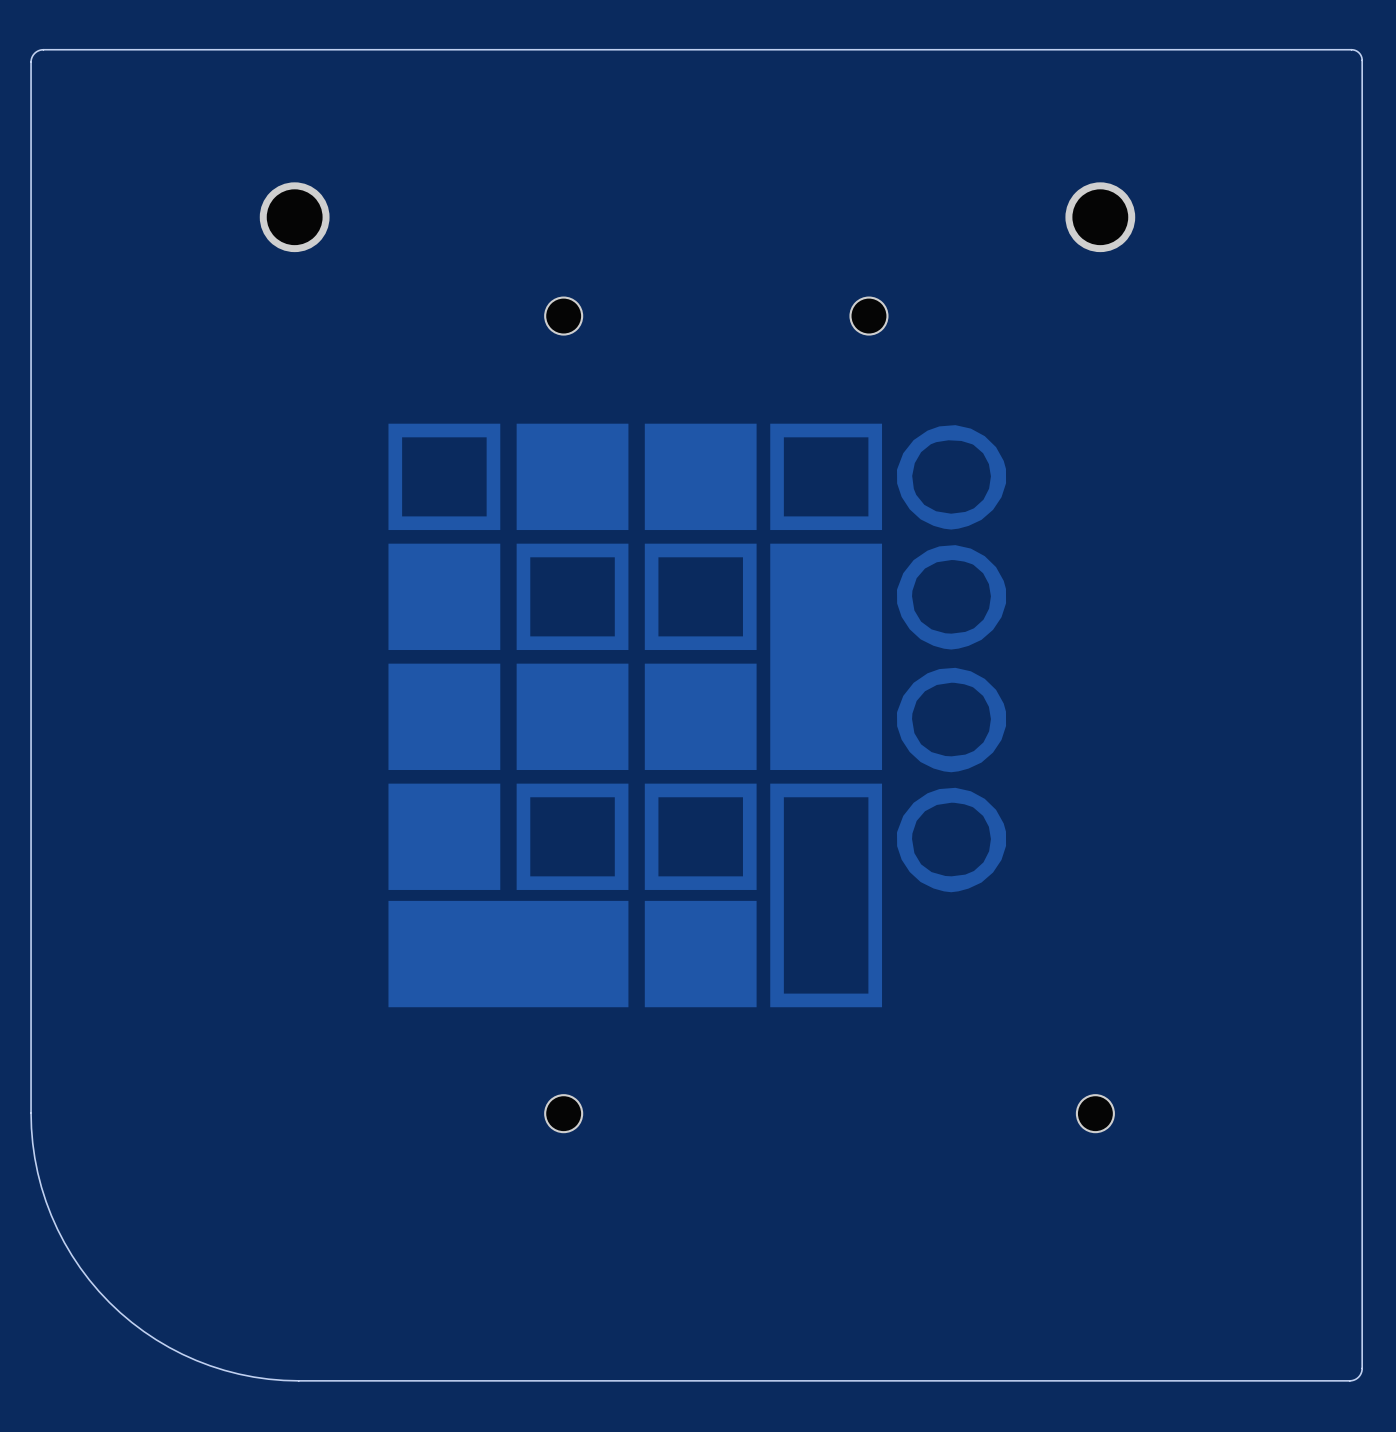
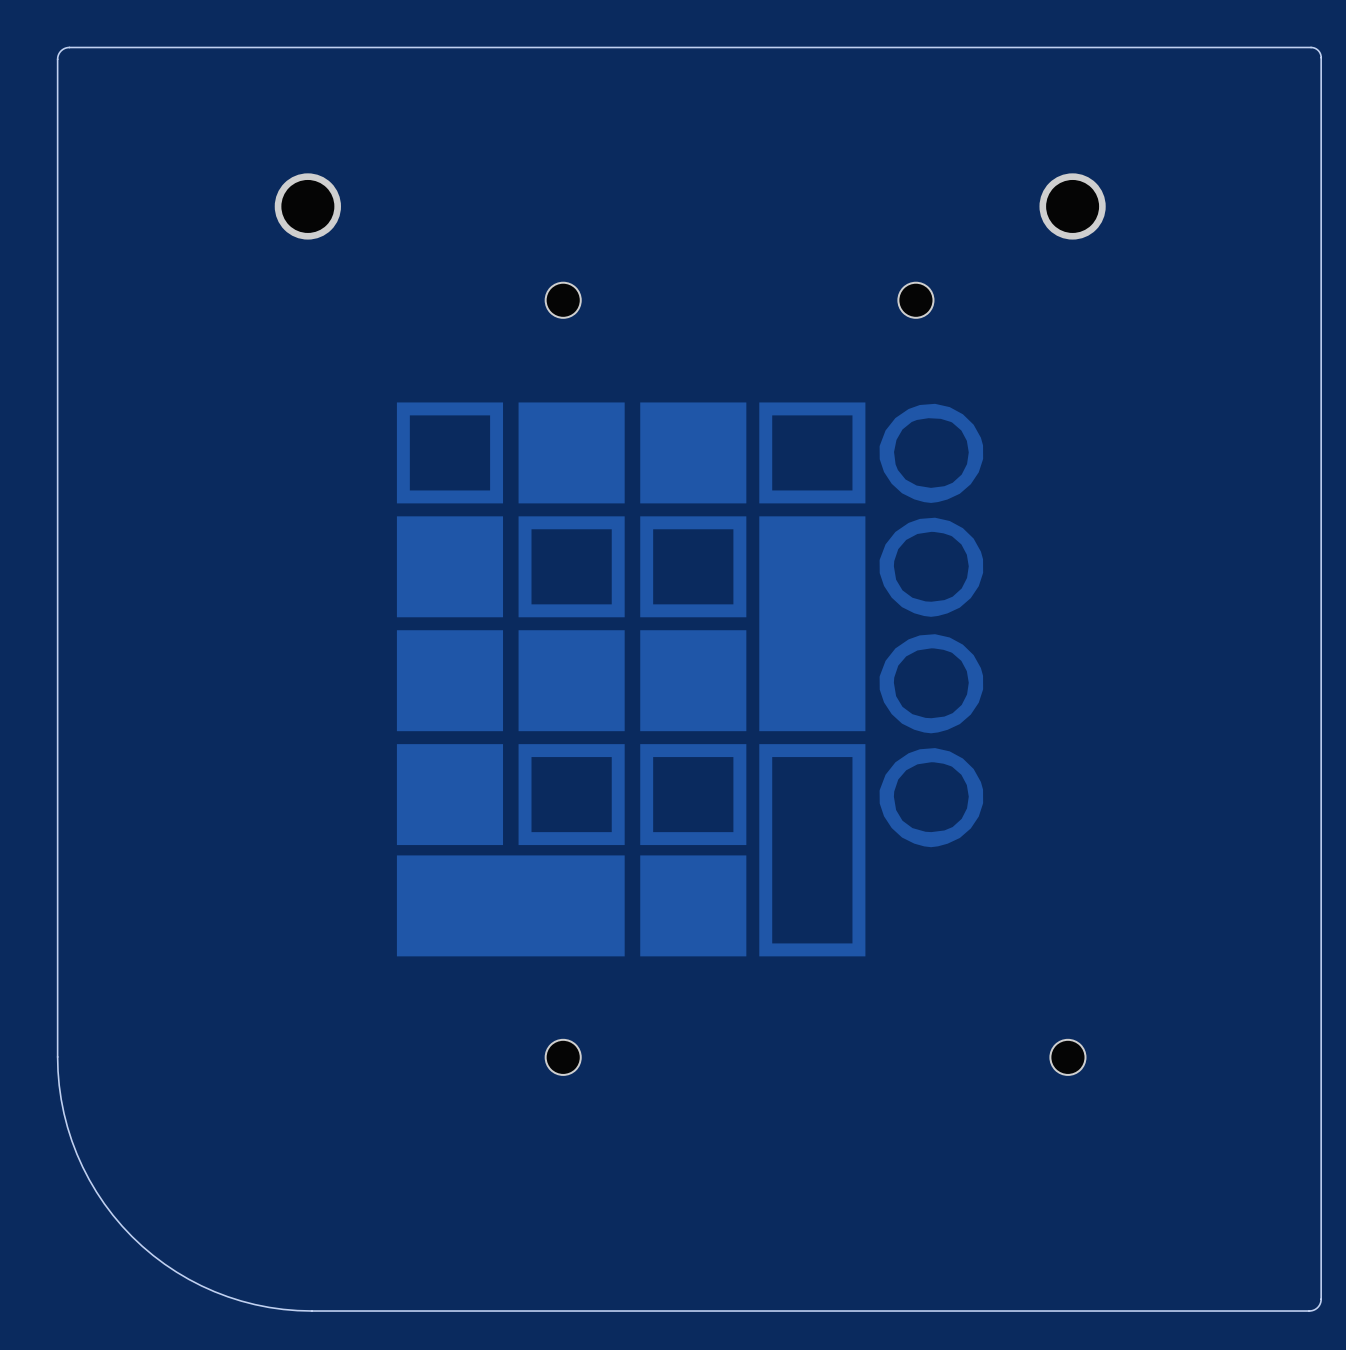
part position: (868, 316) -> (915, 300)

